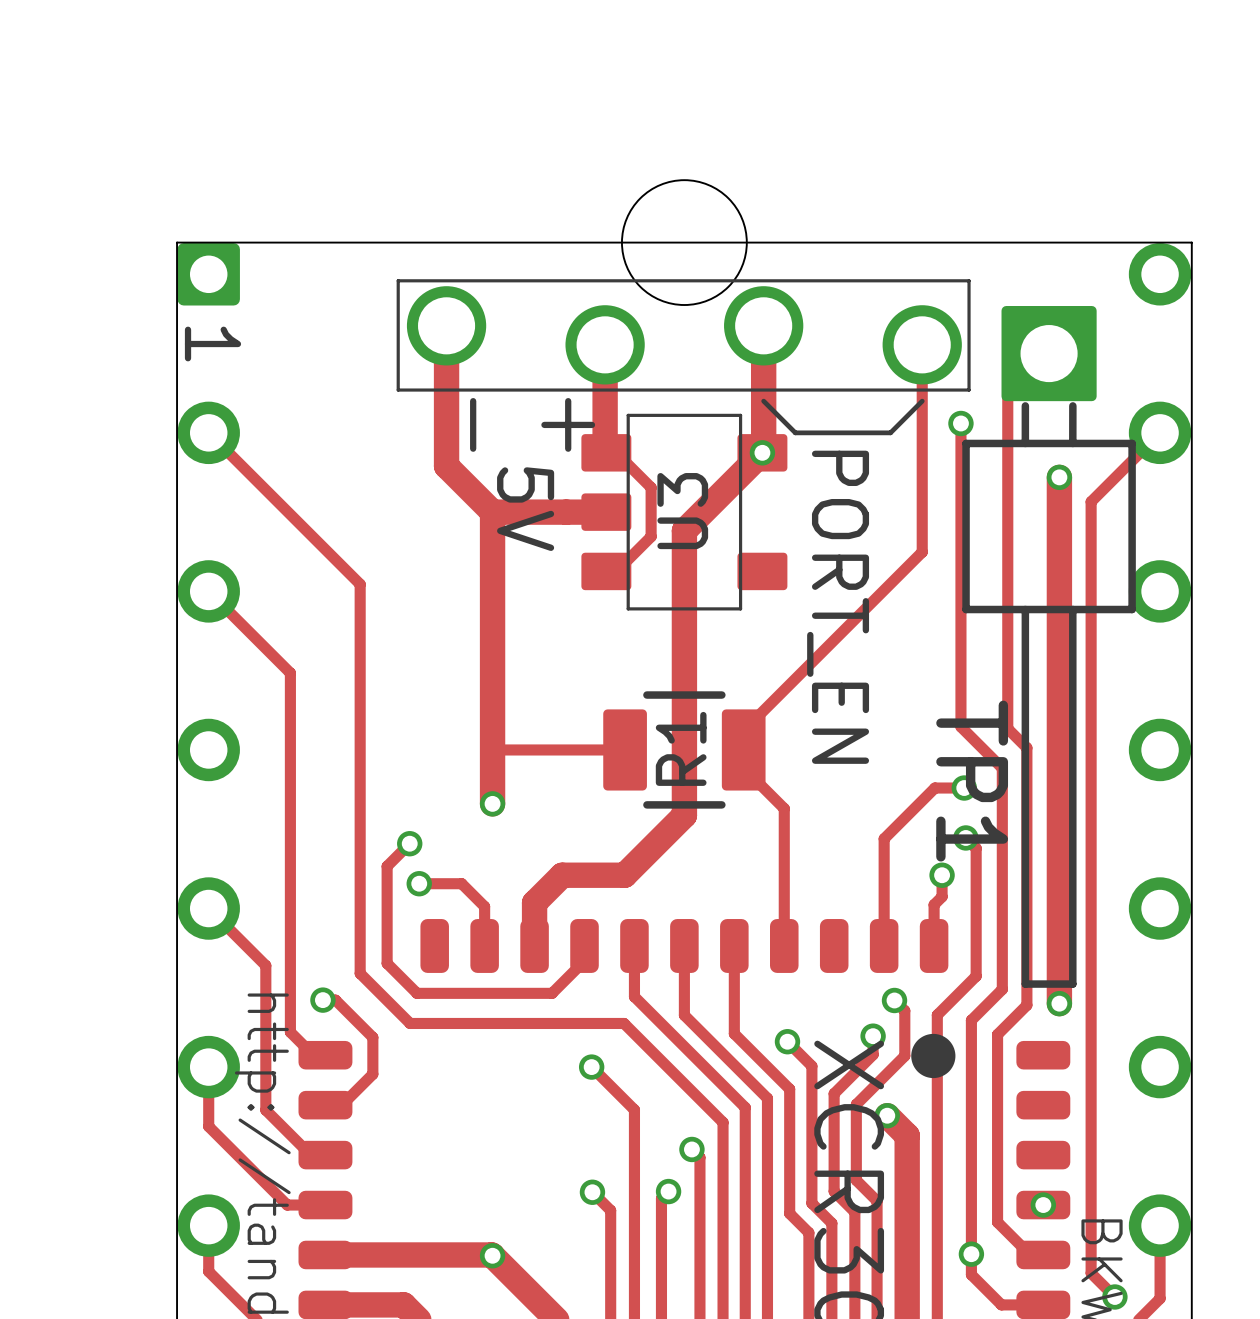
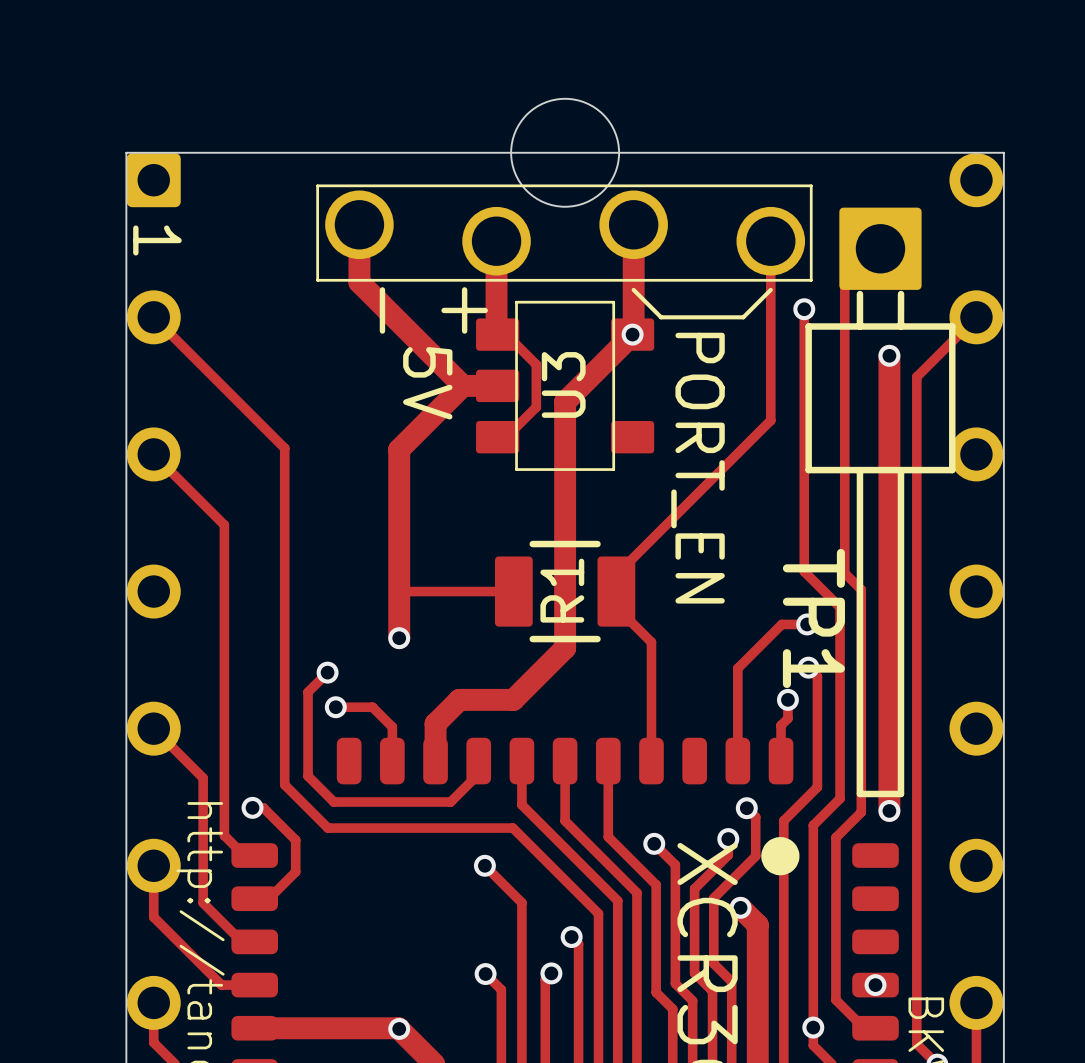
track: (446, 392) (446, 466) (492, 512) -> (359, 282) (462, 385) (399, 449)
track: (492, 512) (566, 512) -> none
track: (492, 512) (492, 585) -> none

